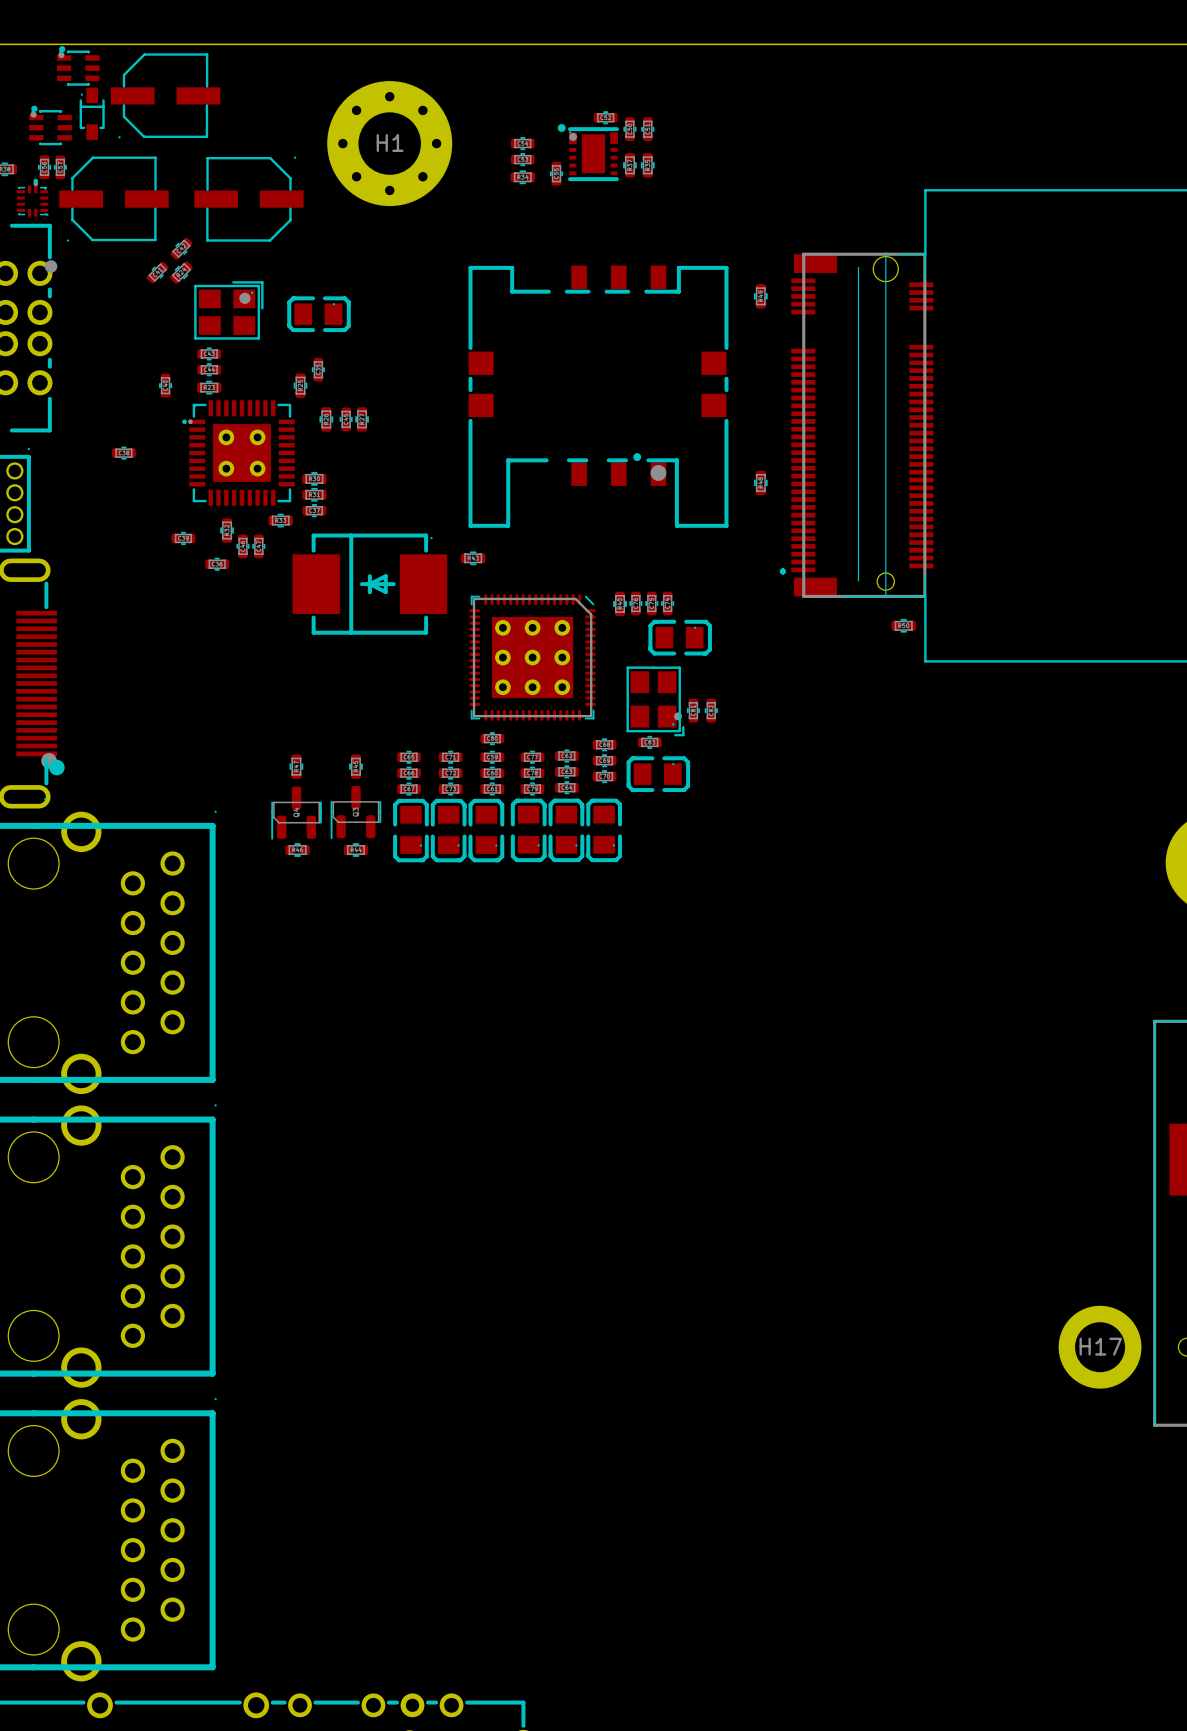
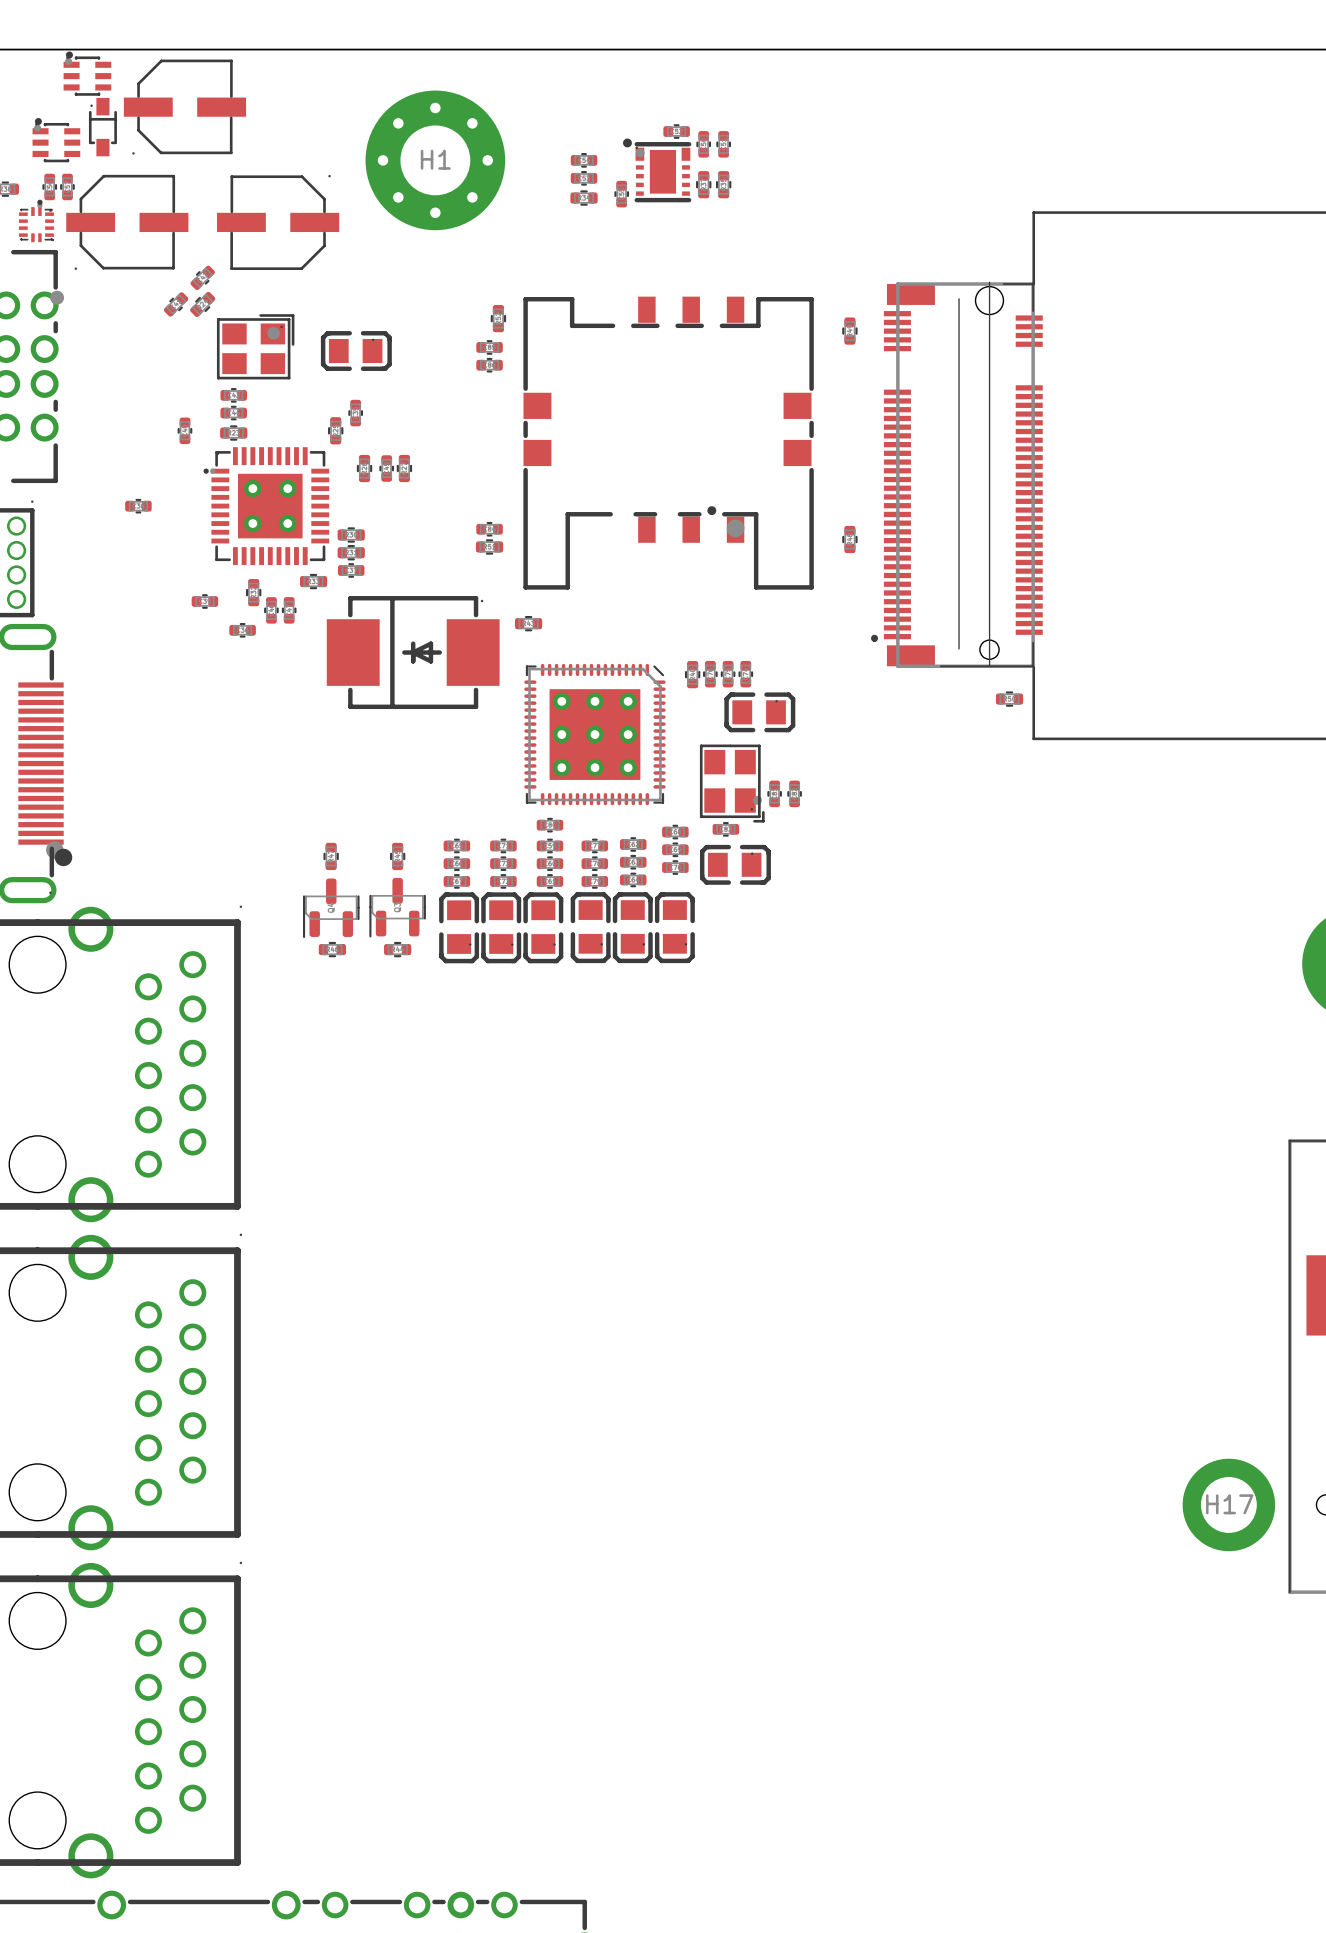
part: none -> (498, 318)
part: none -> (489, 347)
part: none -> (489, 365)
part: none -> (489, 529)
part: none -> (489, 546)

